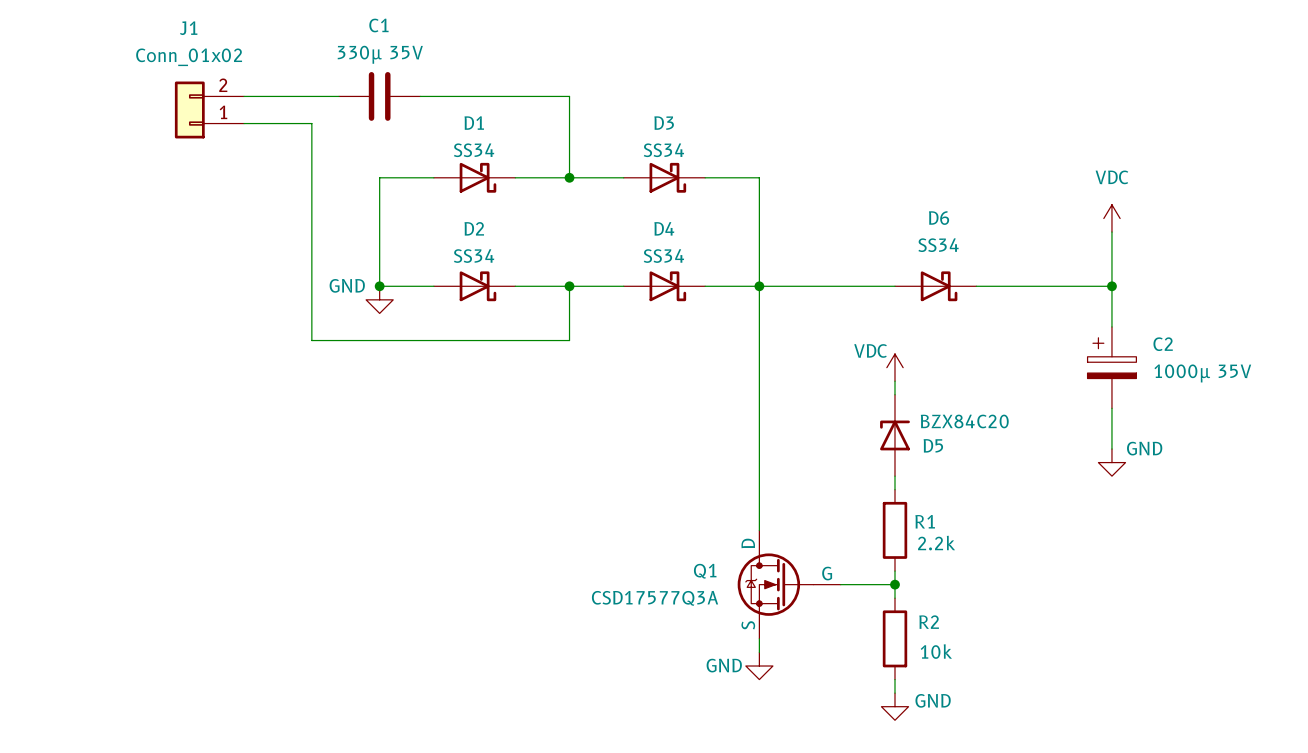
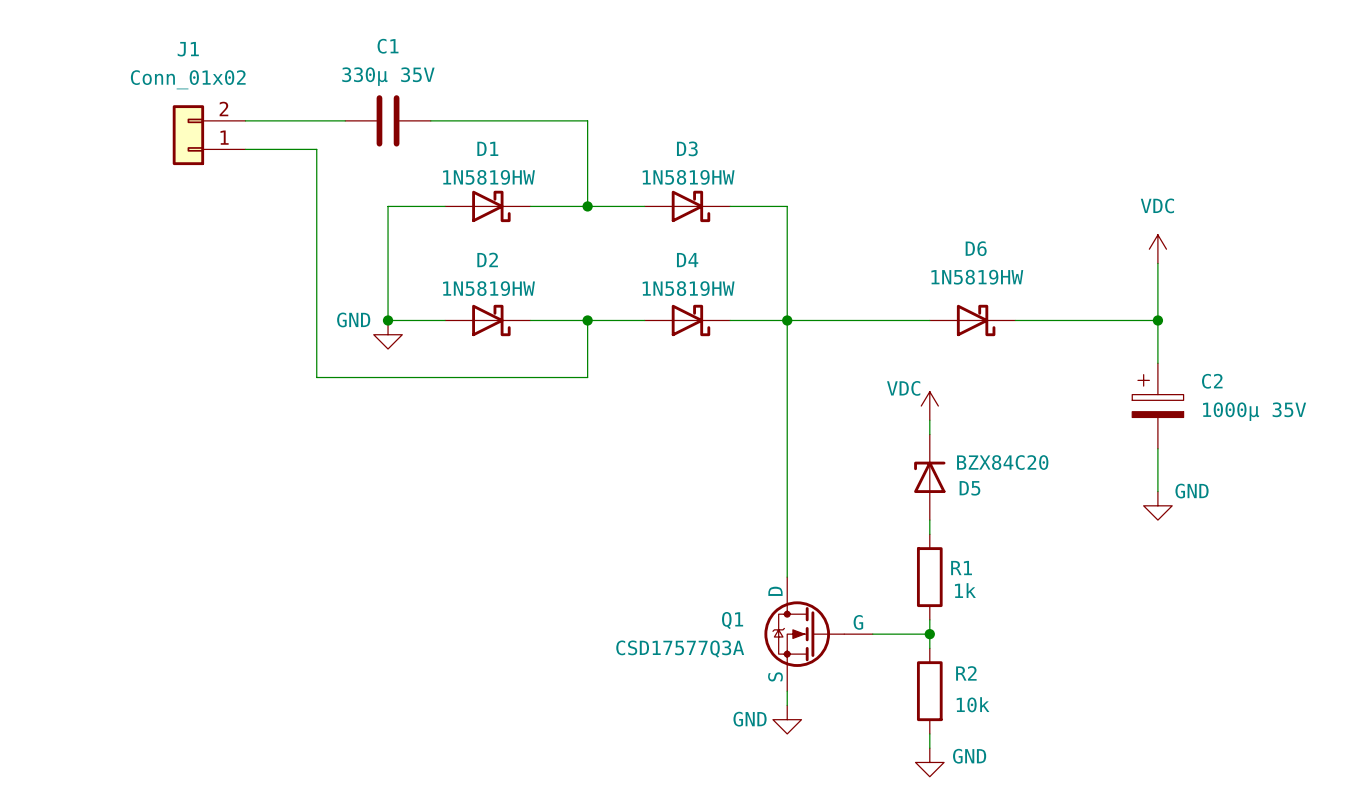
D1 value: SS34 (474, 150) -> 1N5819HW (489, 177)
D3 value: SS34 (663, 150) -> 1N5819HW (688, 177)
D6 value: SS34 (938, 245) -> 1N5819HW (977, 277)
D2 value: SS34 (474, 256) -> 1N5819HW (489, 288)
D4 value: SS34 (663, 256) -> 1N5819HW (688, 288)
R1 value: 2.2k (936, 543) -> 1k (965, 590)

